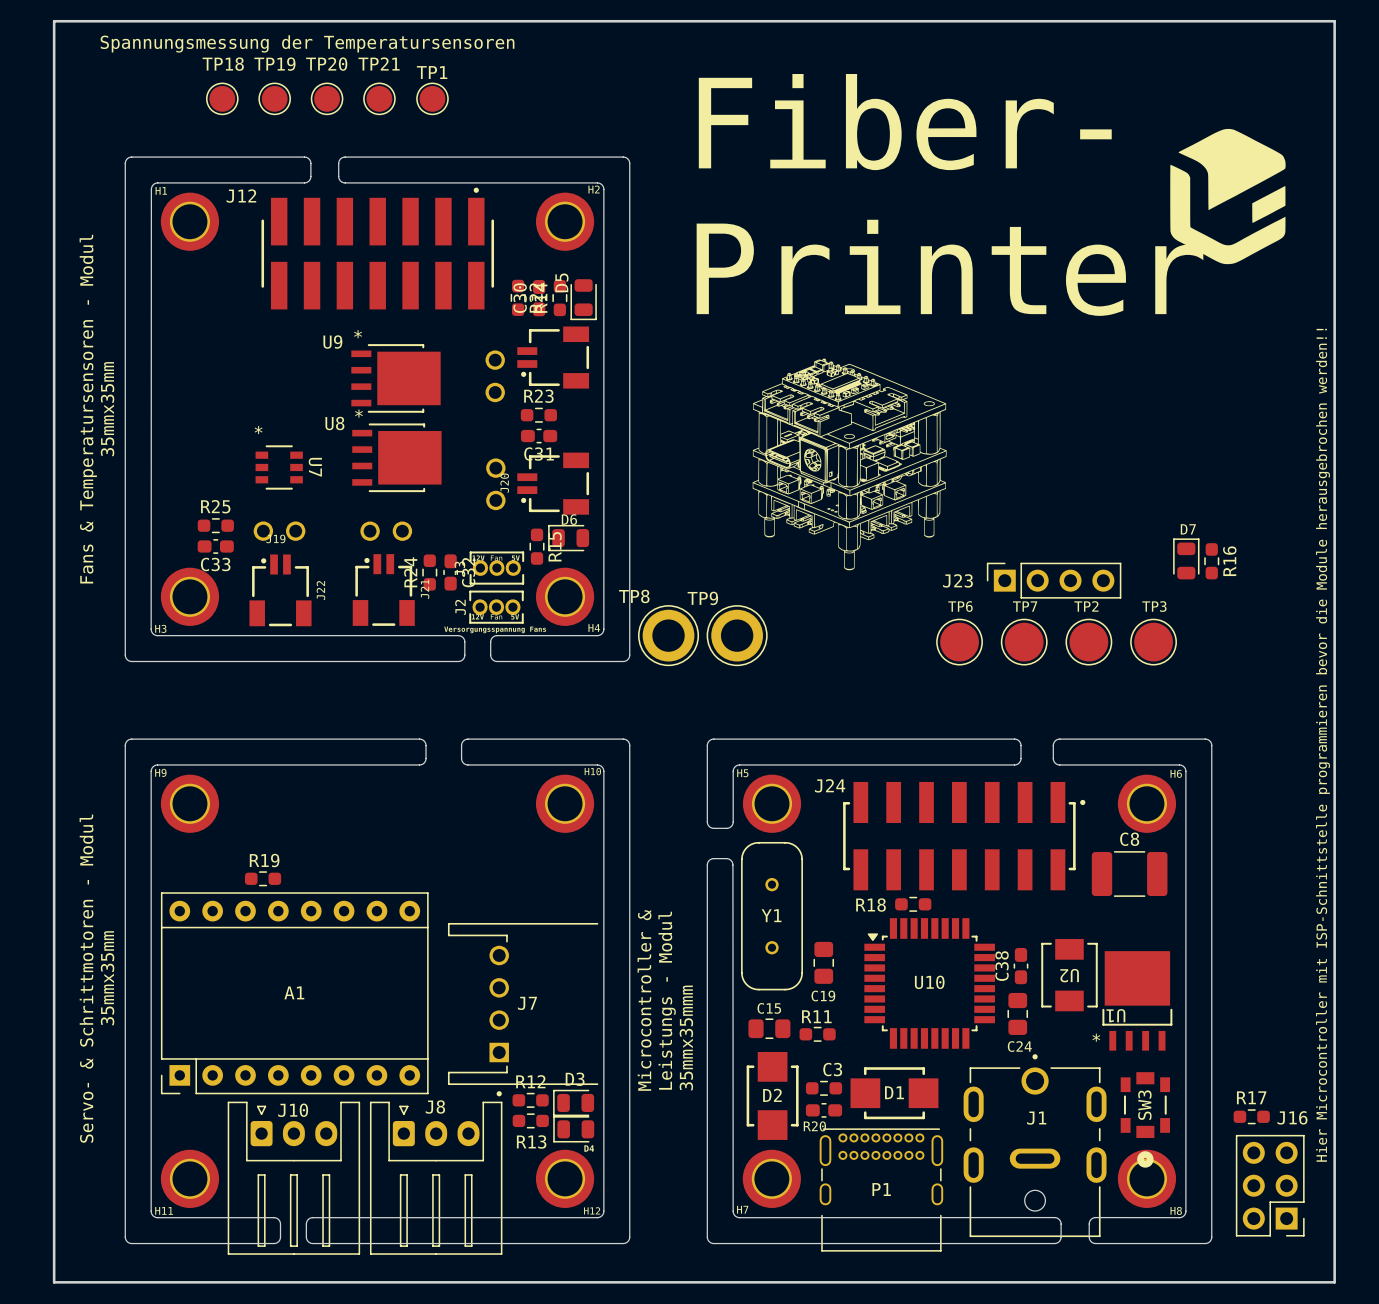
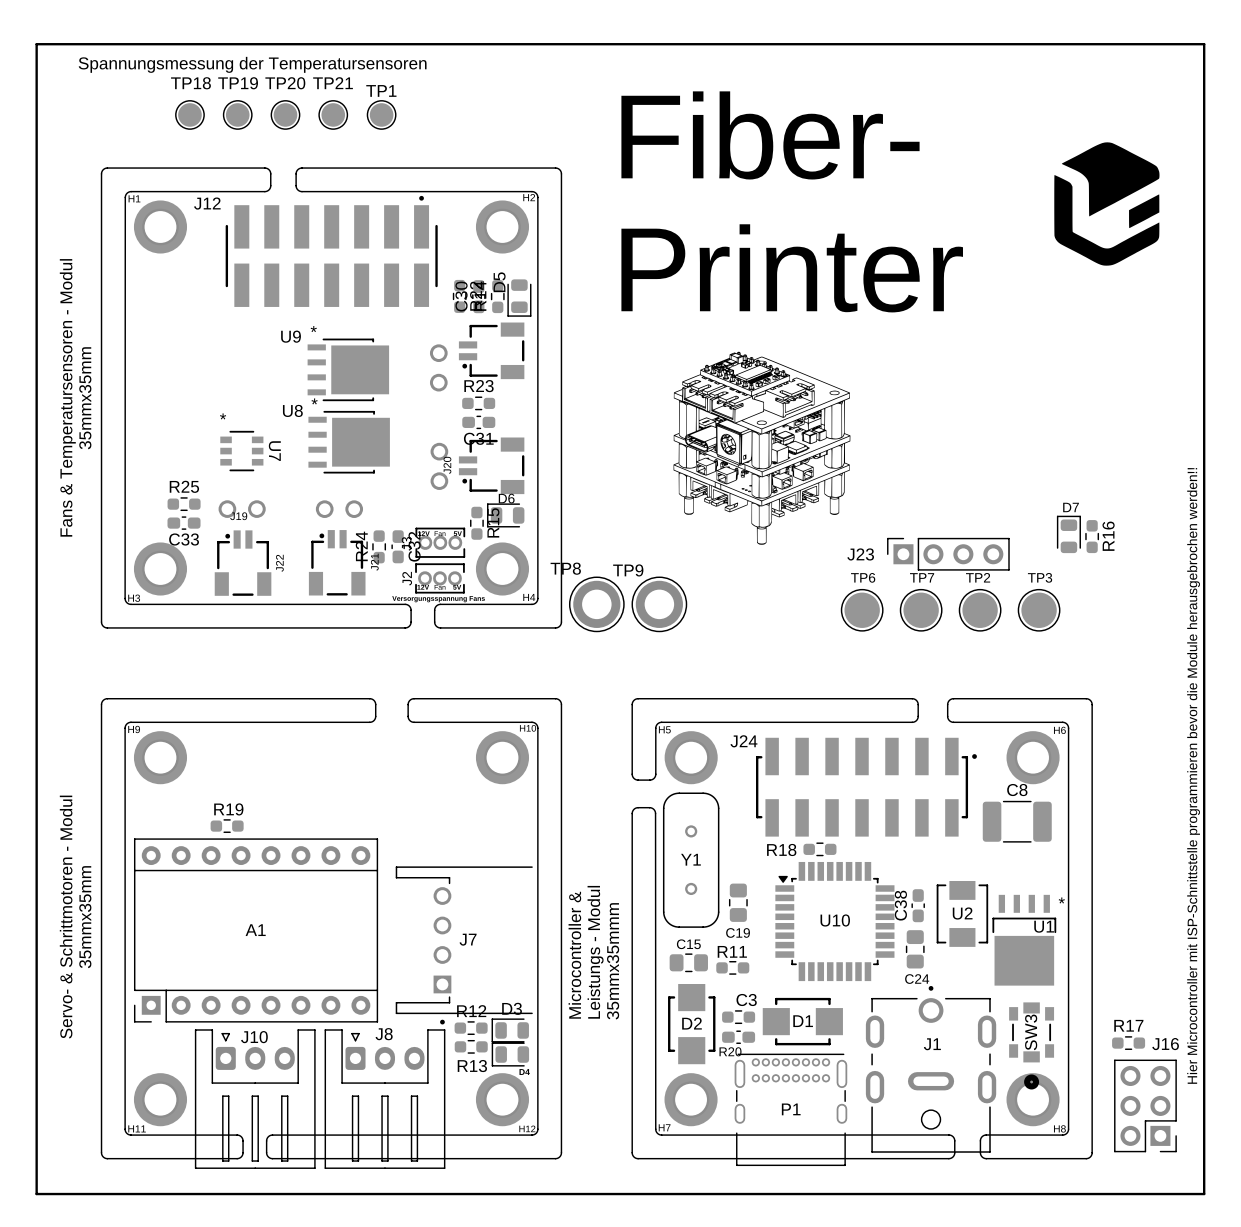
U2 name rotation: 0° (1069, 975) -> 180° (962, 913)
U1 rotation: 0° (1137, 1000) -> 180° (1024, 940)

